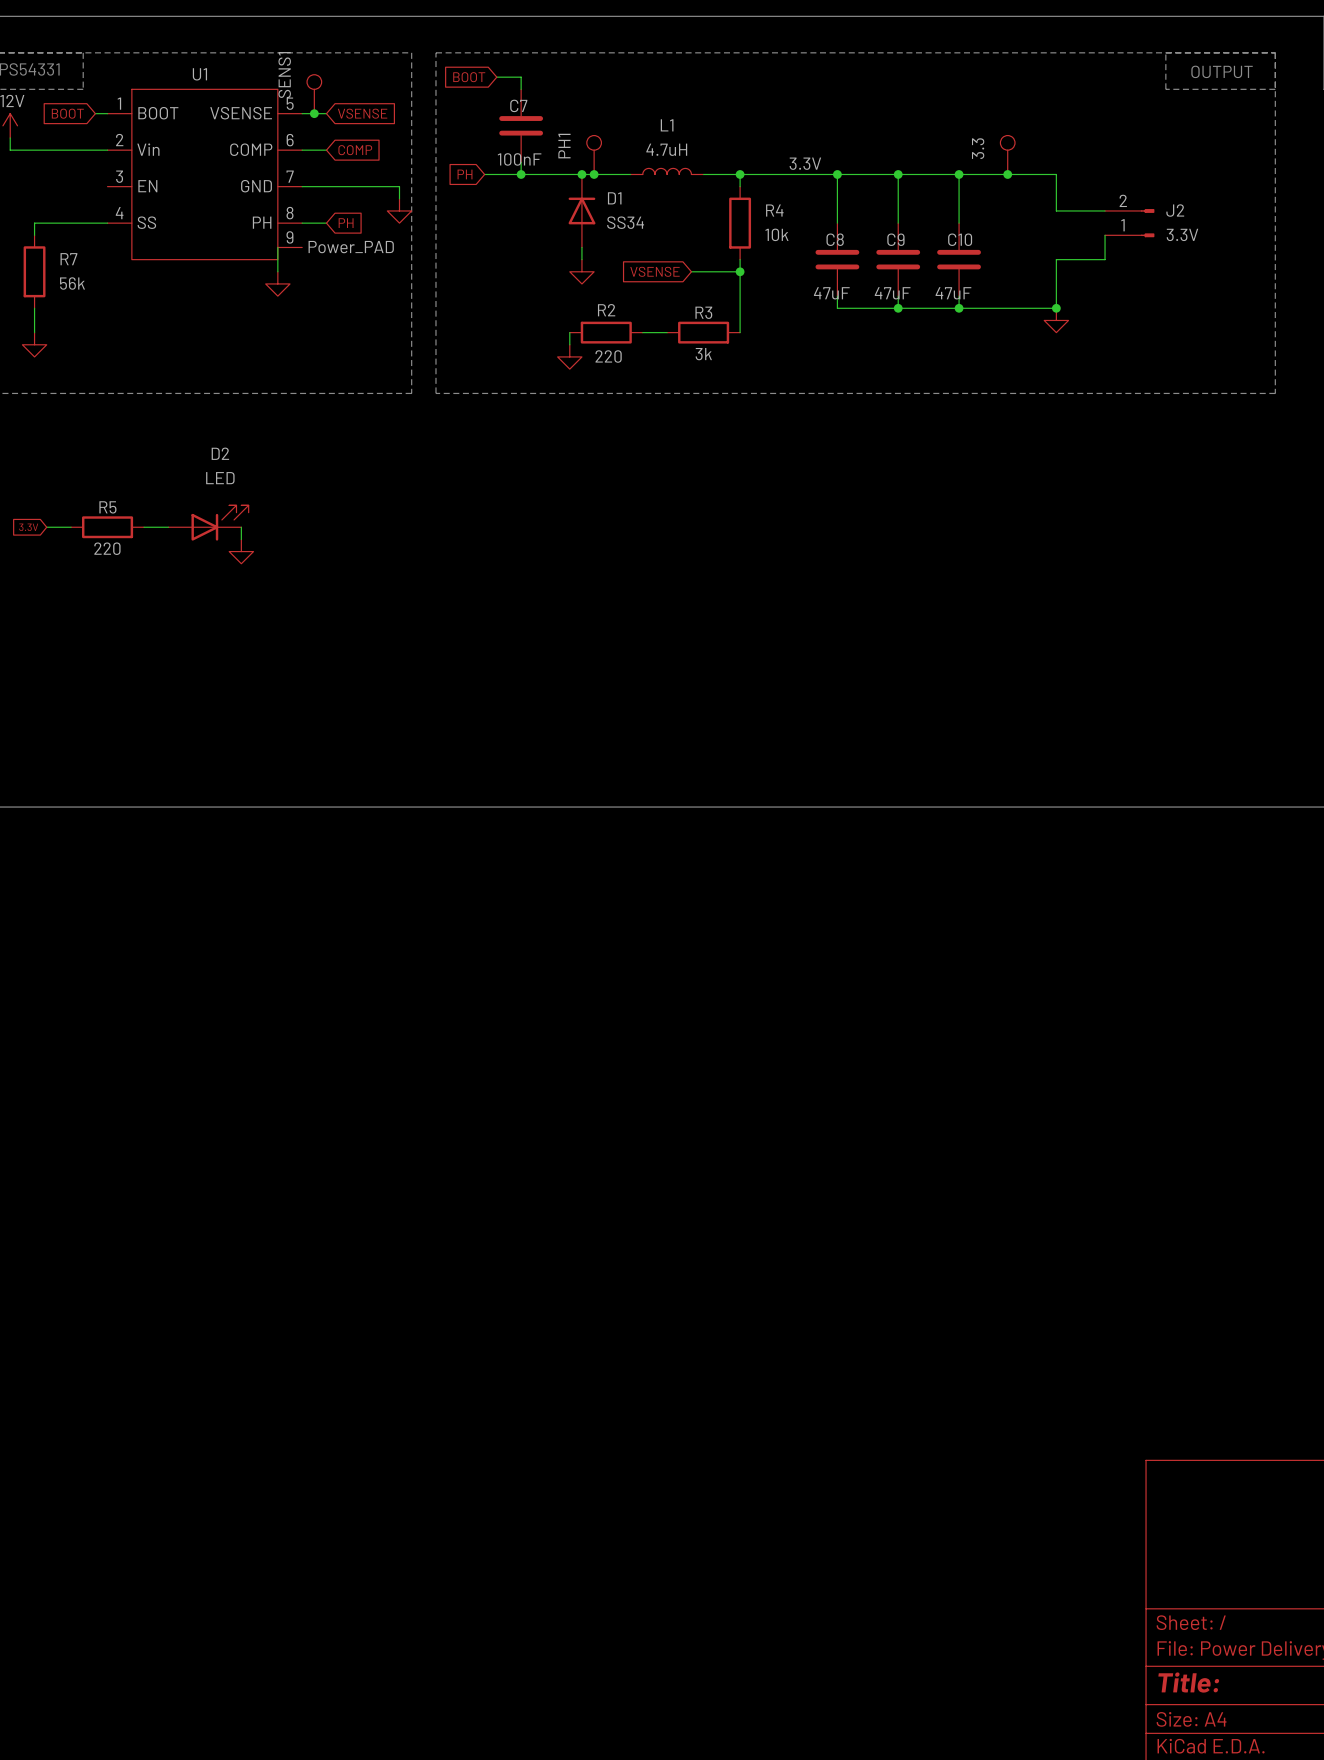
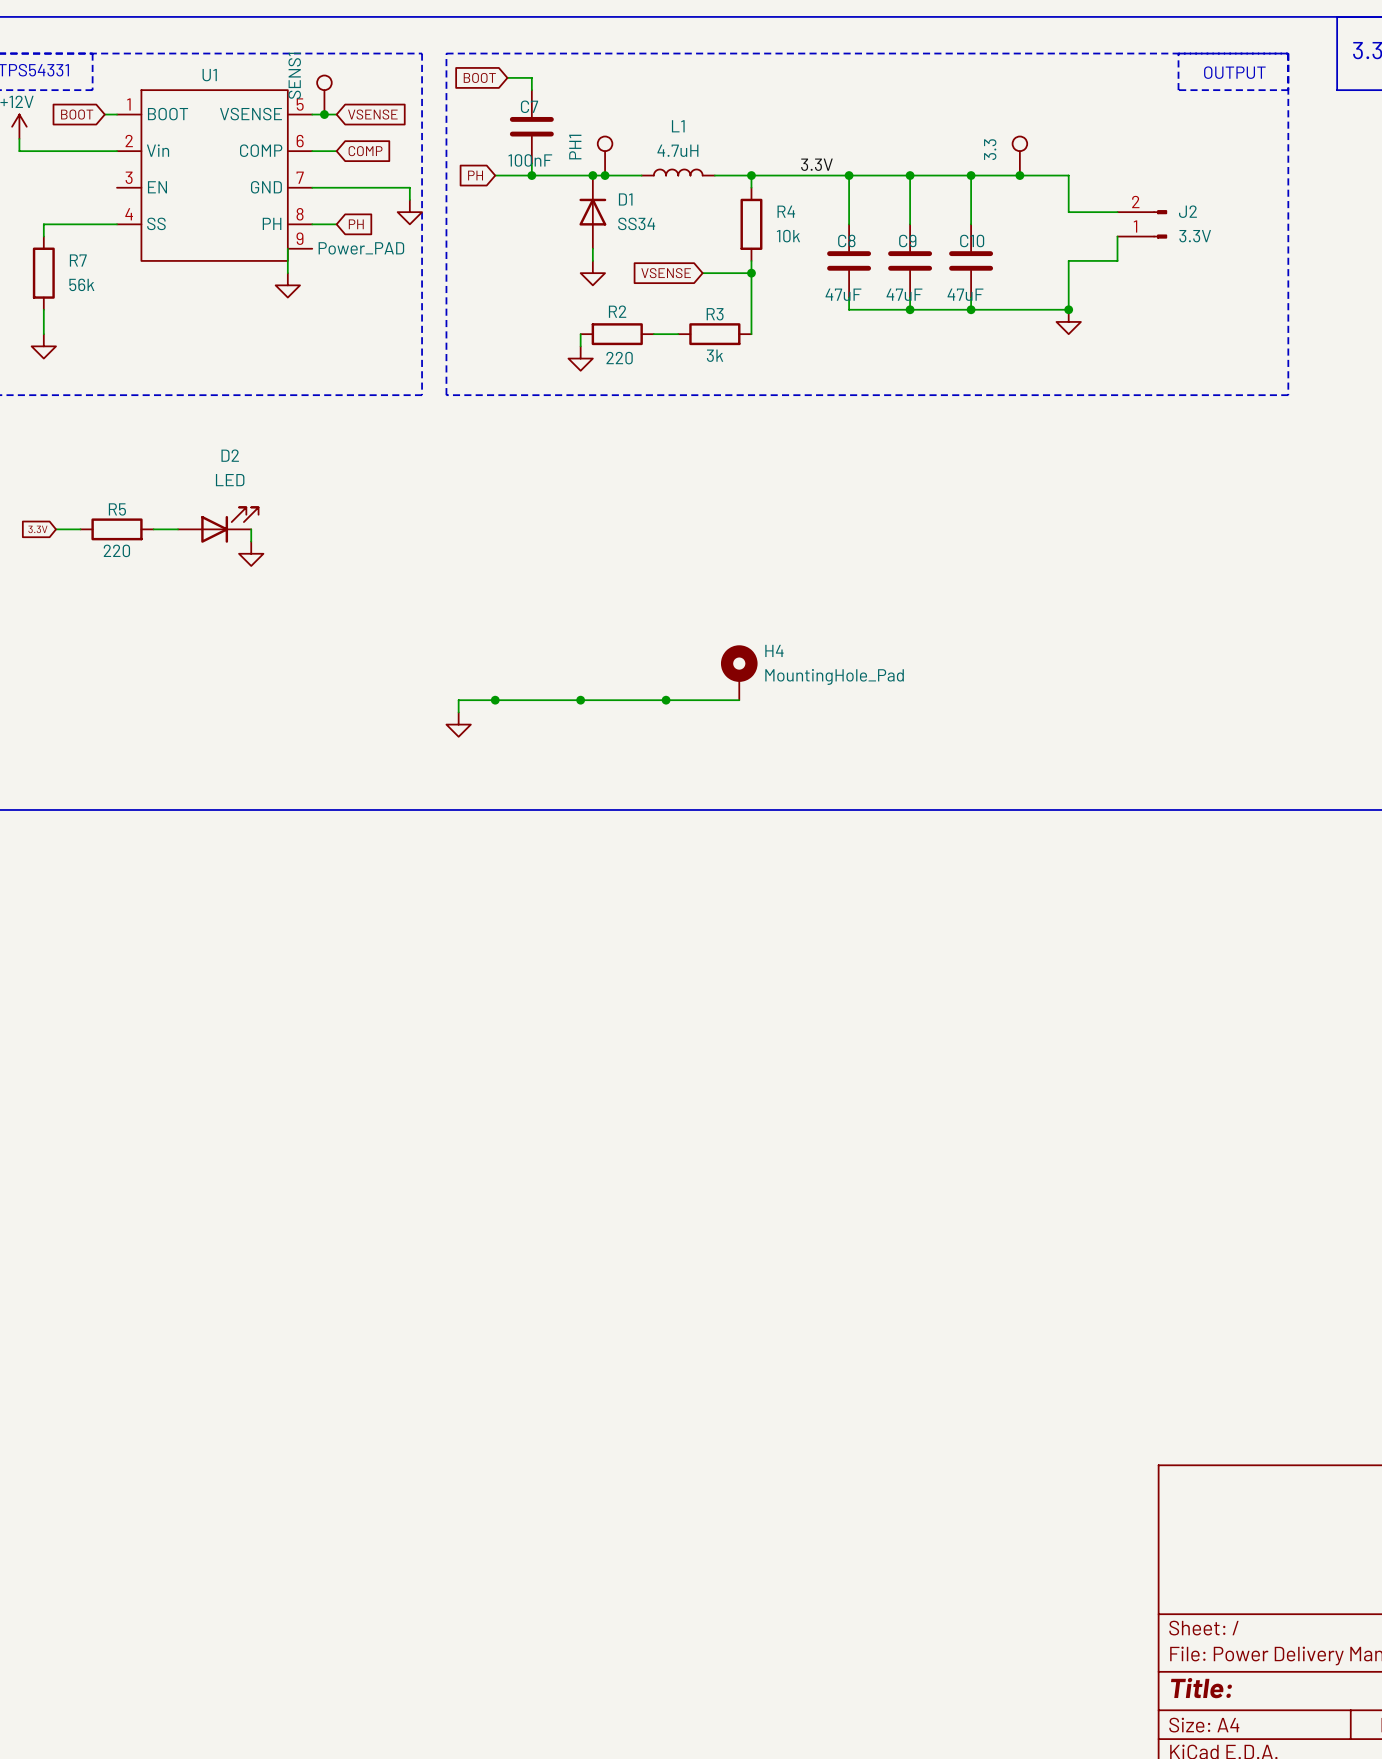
H4: none -> MountingHole_Pad (739, 672)
junction: none -> (495, 700)
junction: none -> (580, 700)
junction: none -> (666, 700)
wire: none -> (739, 700) (458, 700) (458, 712)
power symbol: none -> (458, 724)

